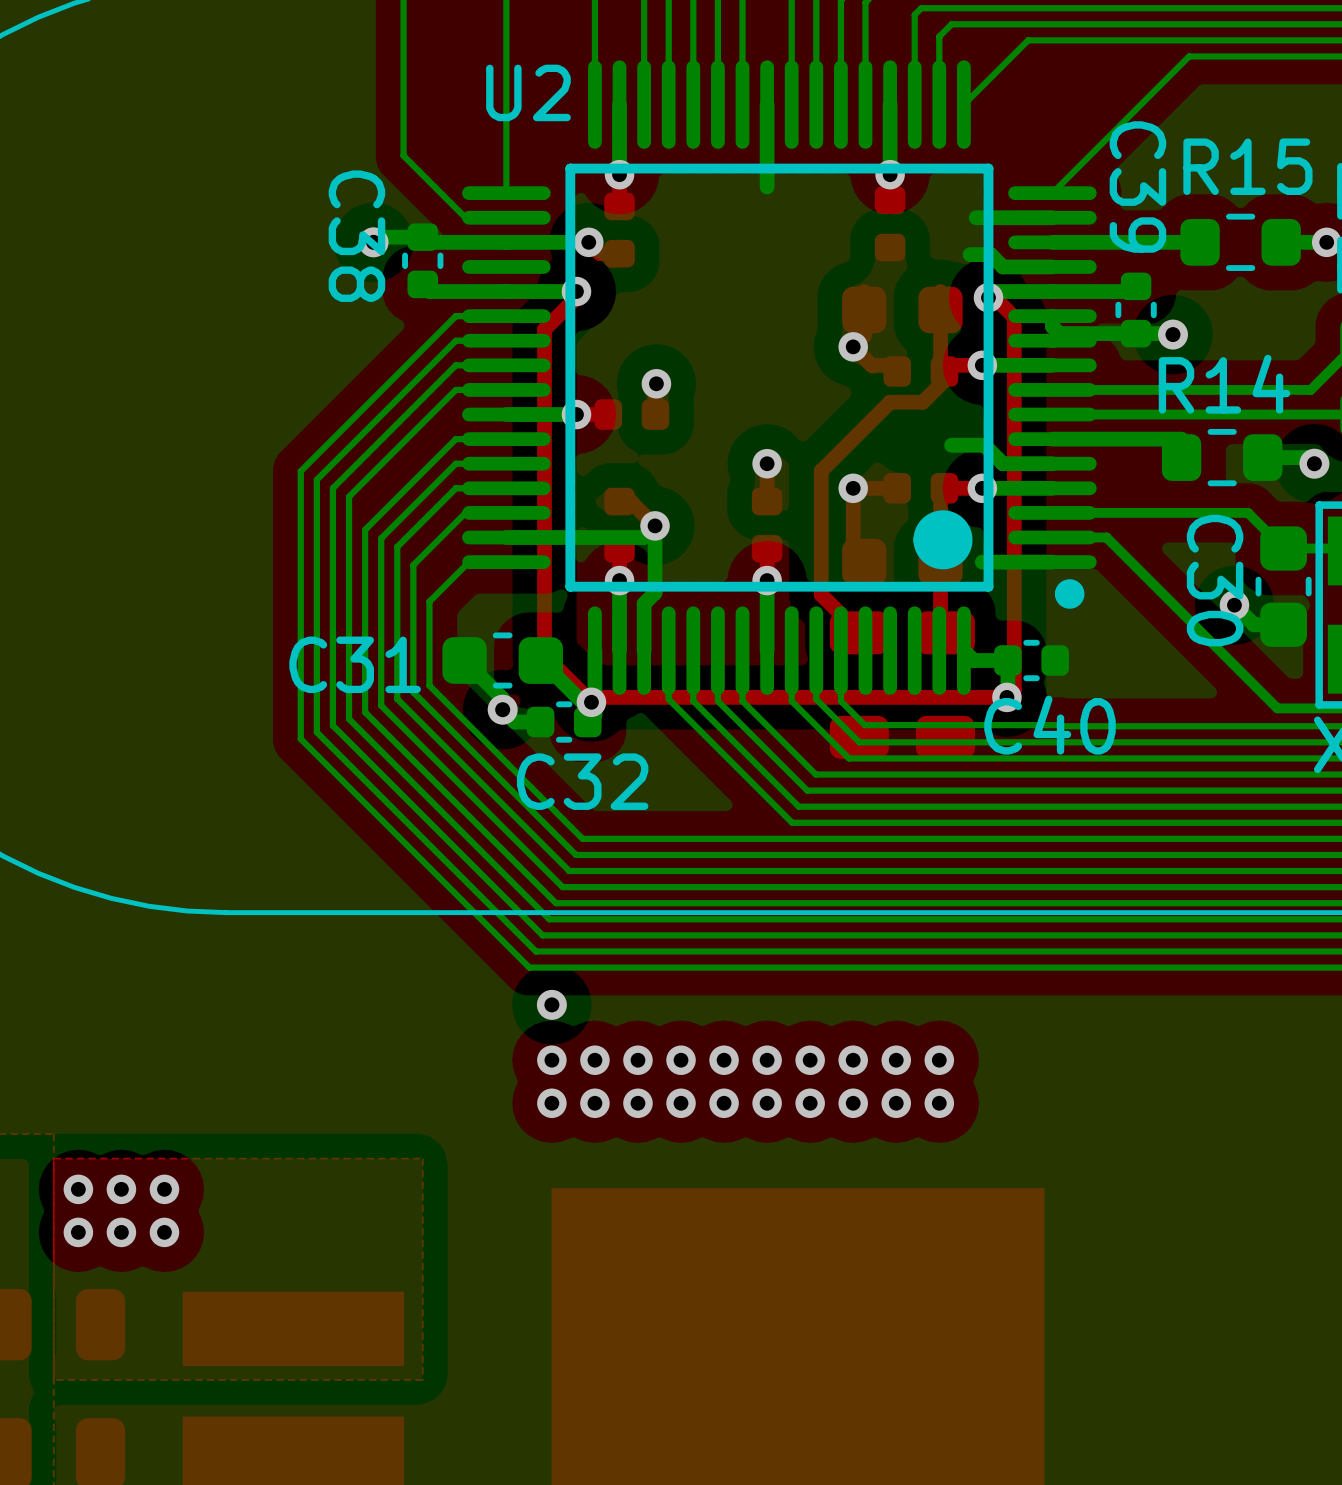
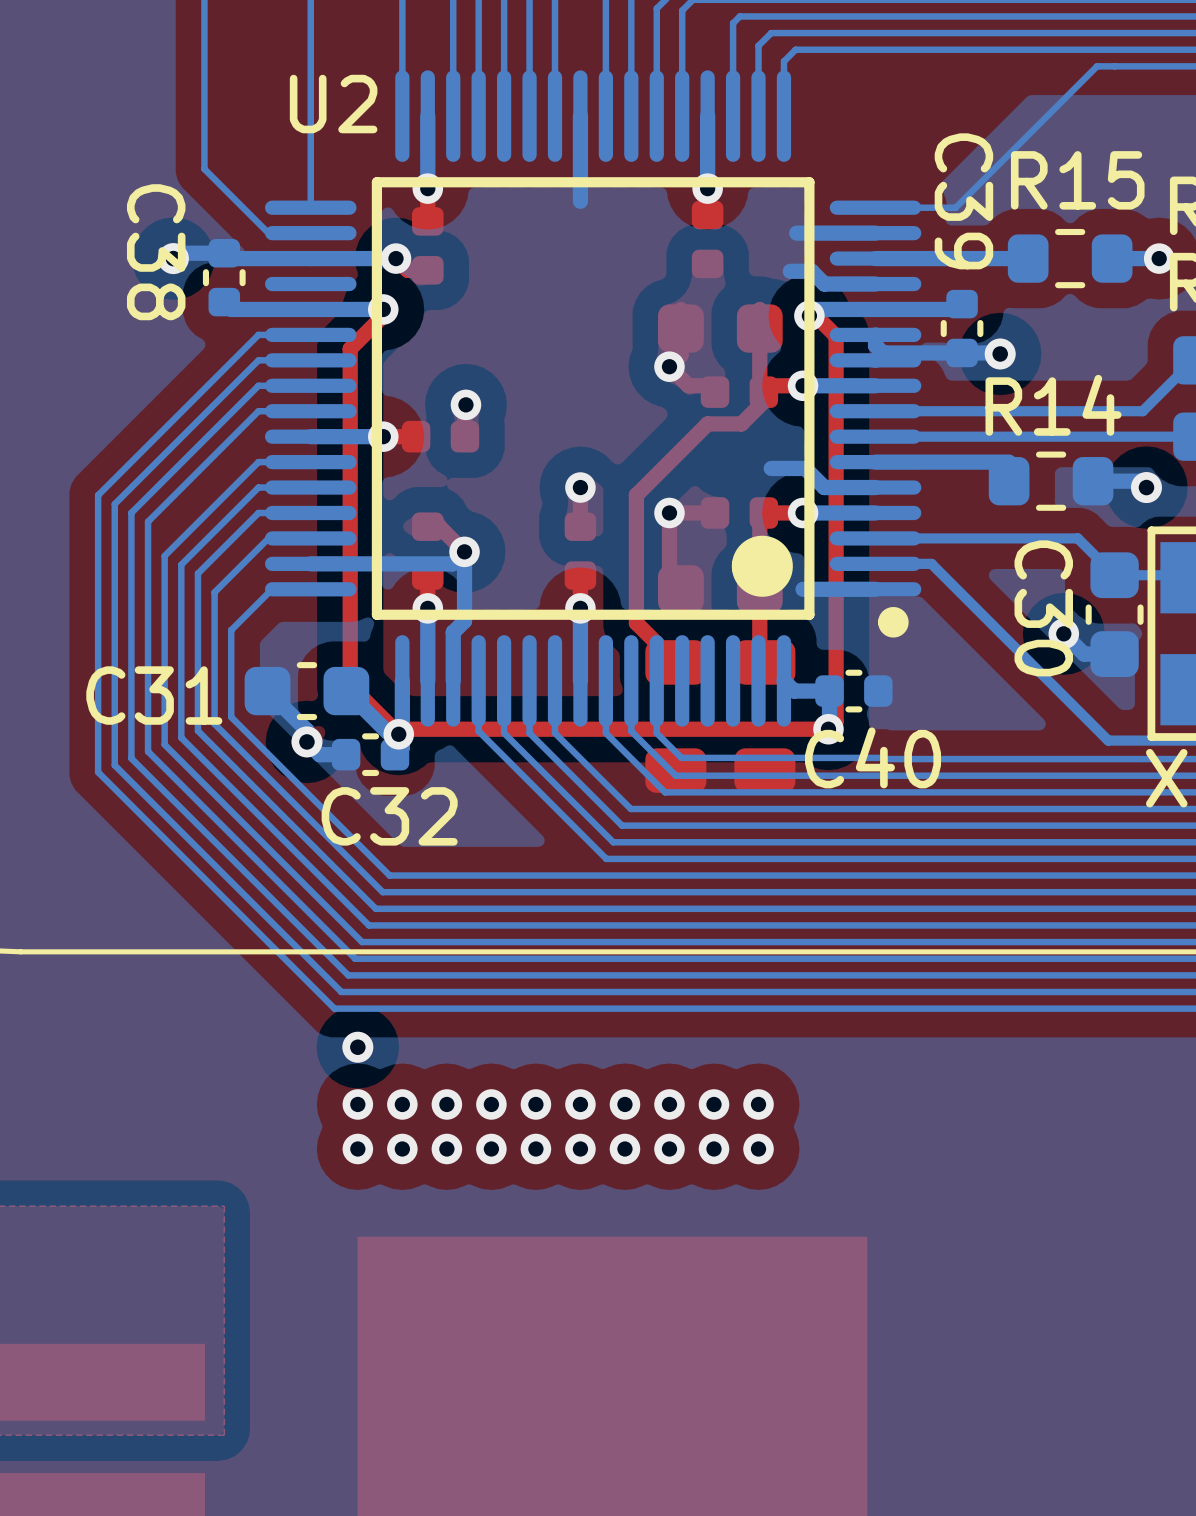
bottom track: (1028, 40) (963, 104) -> (850, 49) (795, 49) (783, 61) (783, 116)
bottom track: (1266, 56) (1189, 56) (1052, 193) -> (1097, 66) (955, 207) (875, 207)

